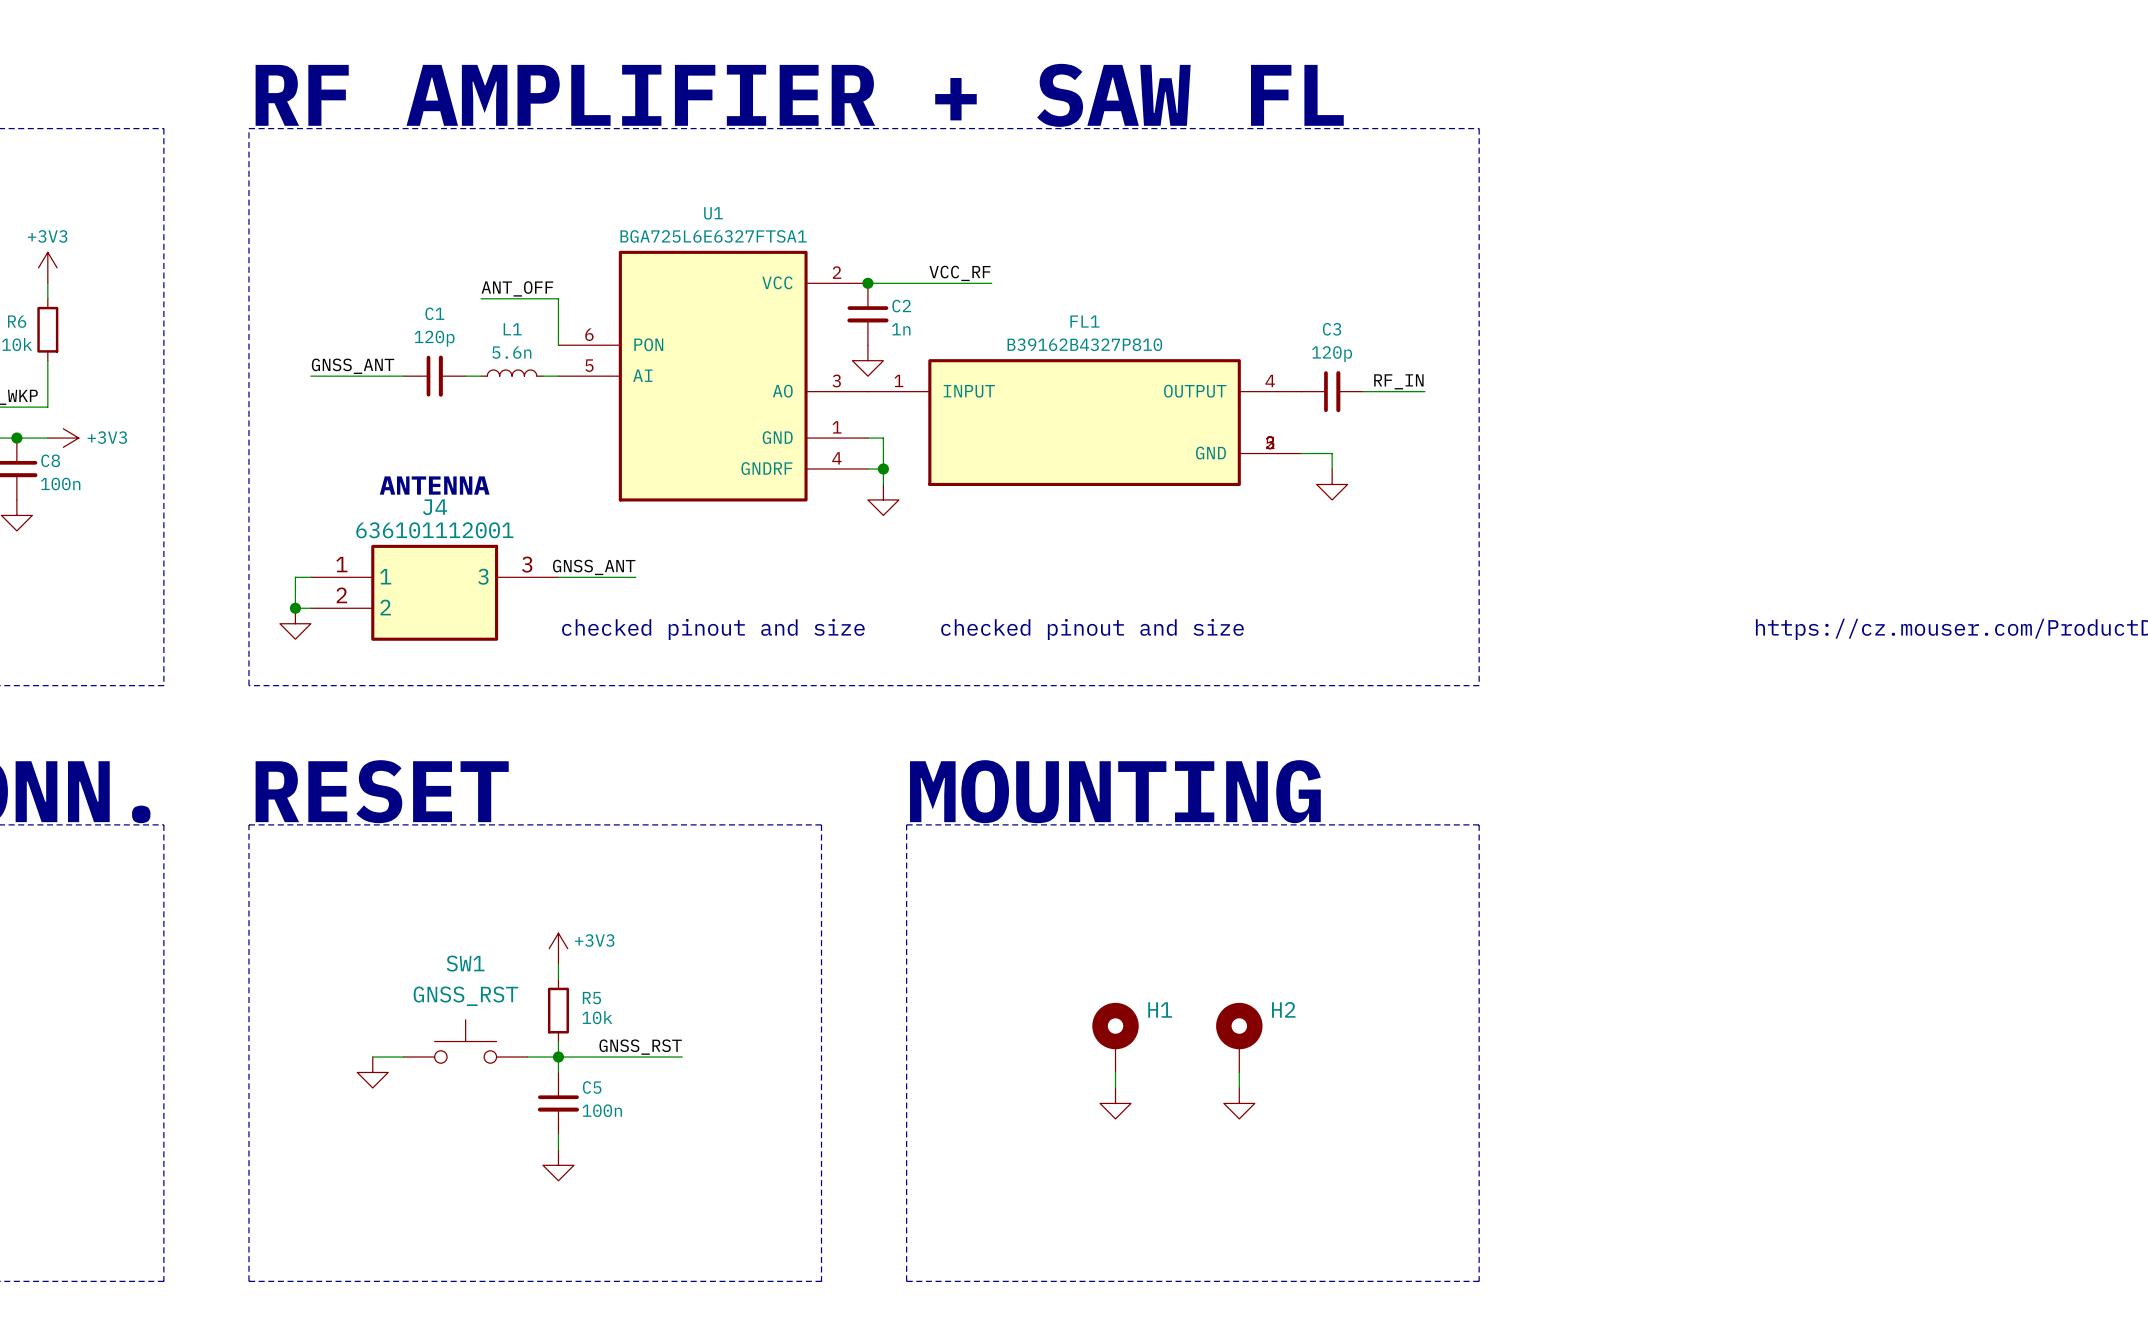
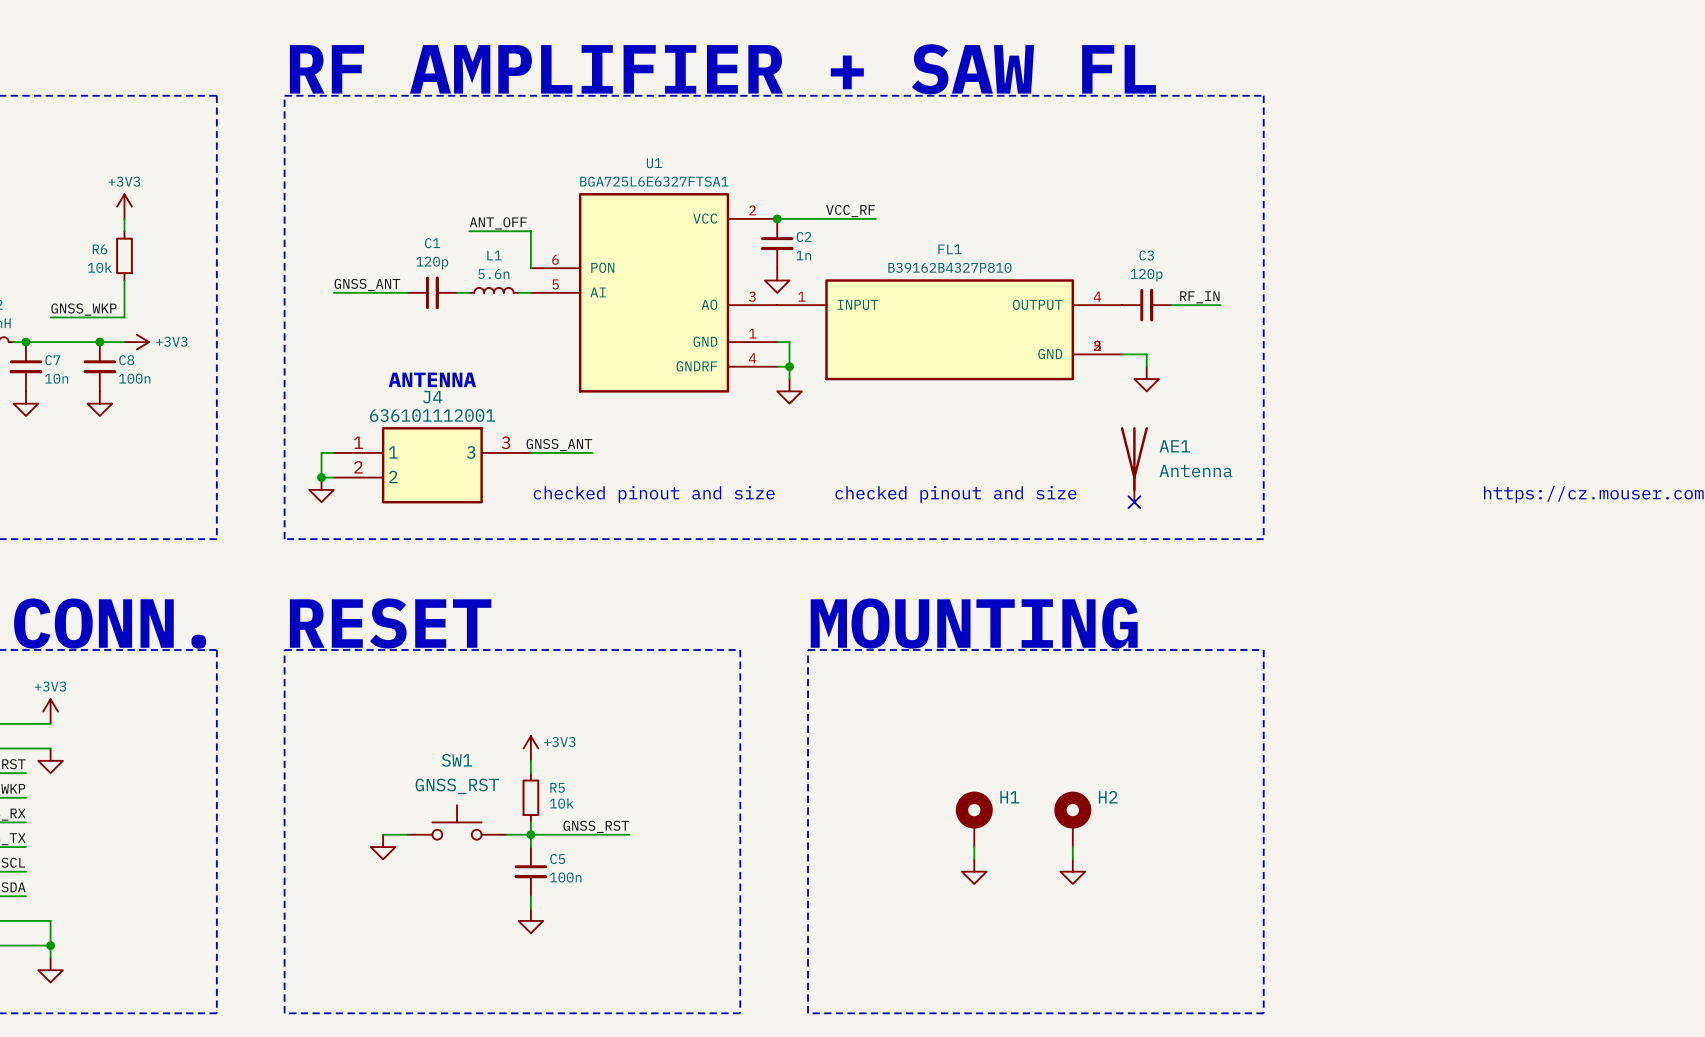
AE1: none -> Antenna (1134, 464)
no-connect mark: none -> (1134, 502)

